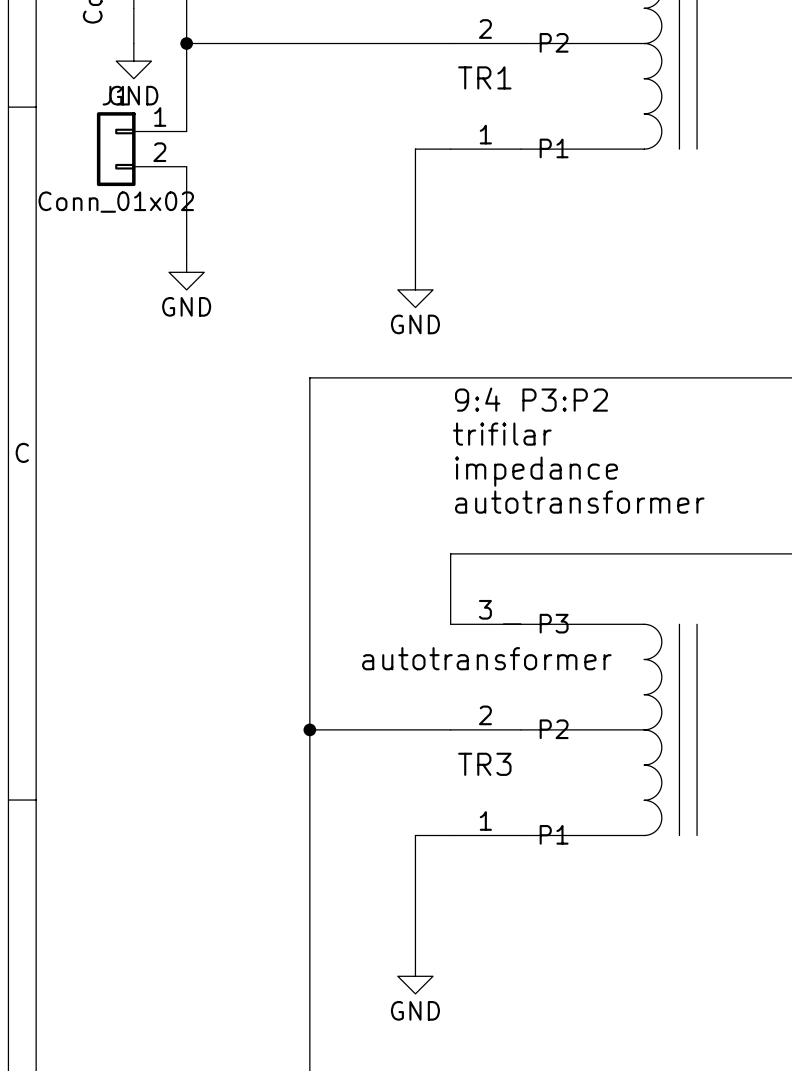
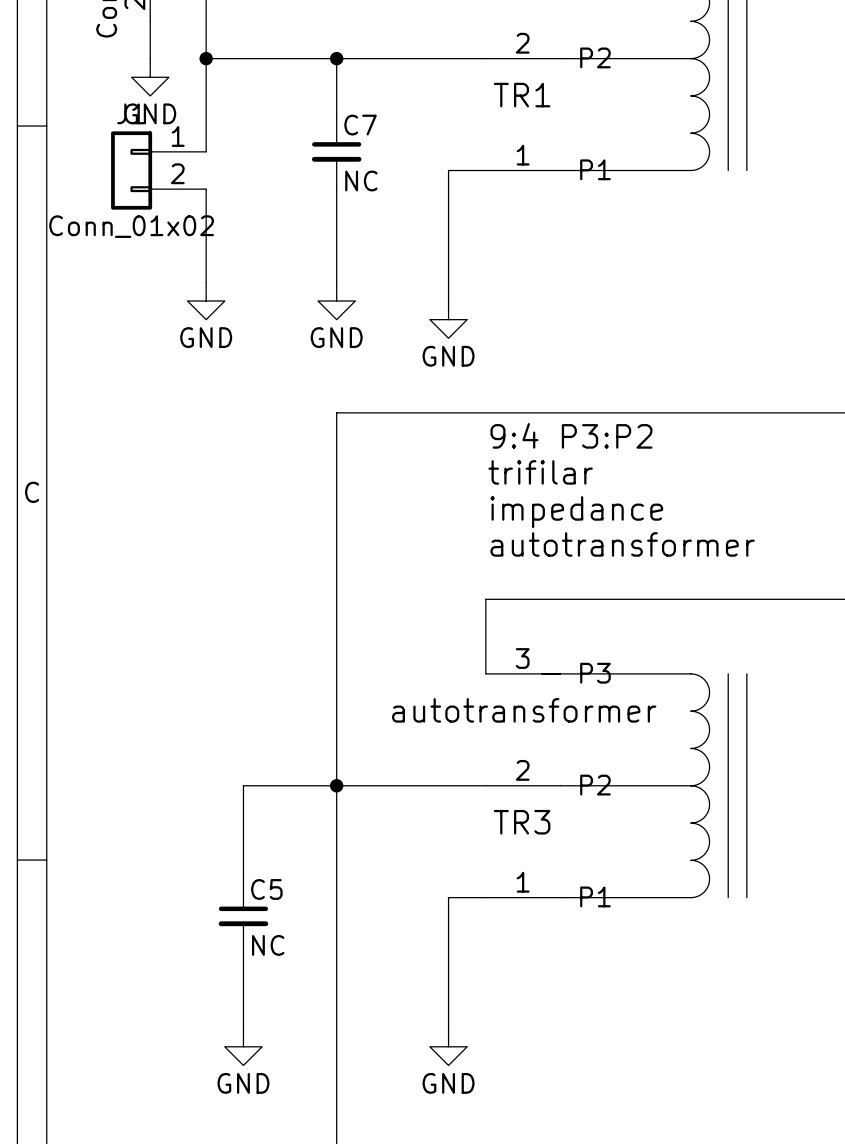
wire: none -> (336, 58) (336, 114)
junction: none -> (336, 58)
C7: none -> NC (336, 151)
wire: none -> (336, 189) (336, 282)
power symbol: none -> GND (336, 301)
wire: none -> (336, 785) (243, 785) (243, 878)
C5: none -> NC (243, 916)
wire: none -> (243, 953) (243, 1028)
power symbol: none -> GND (243, 1046)

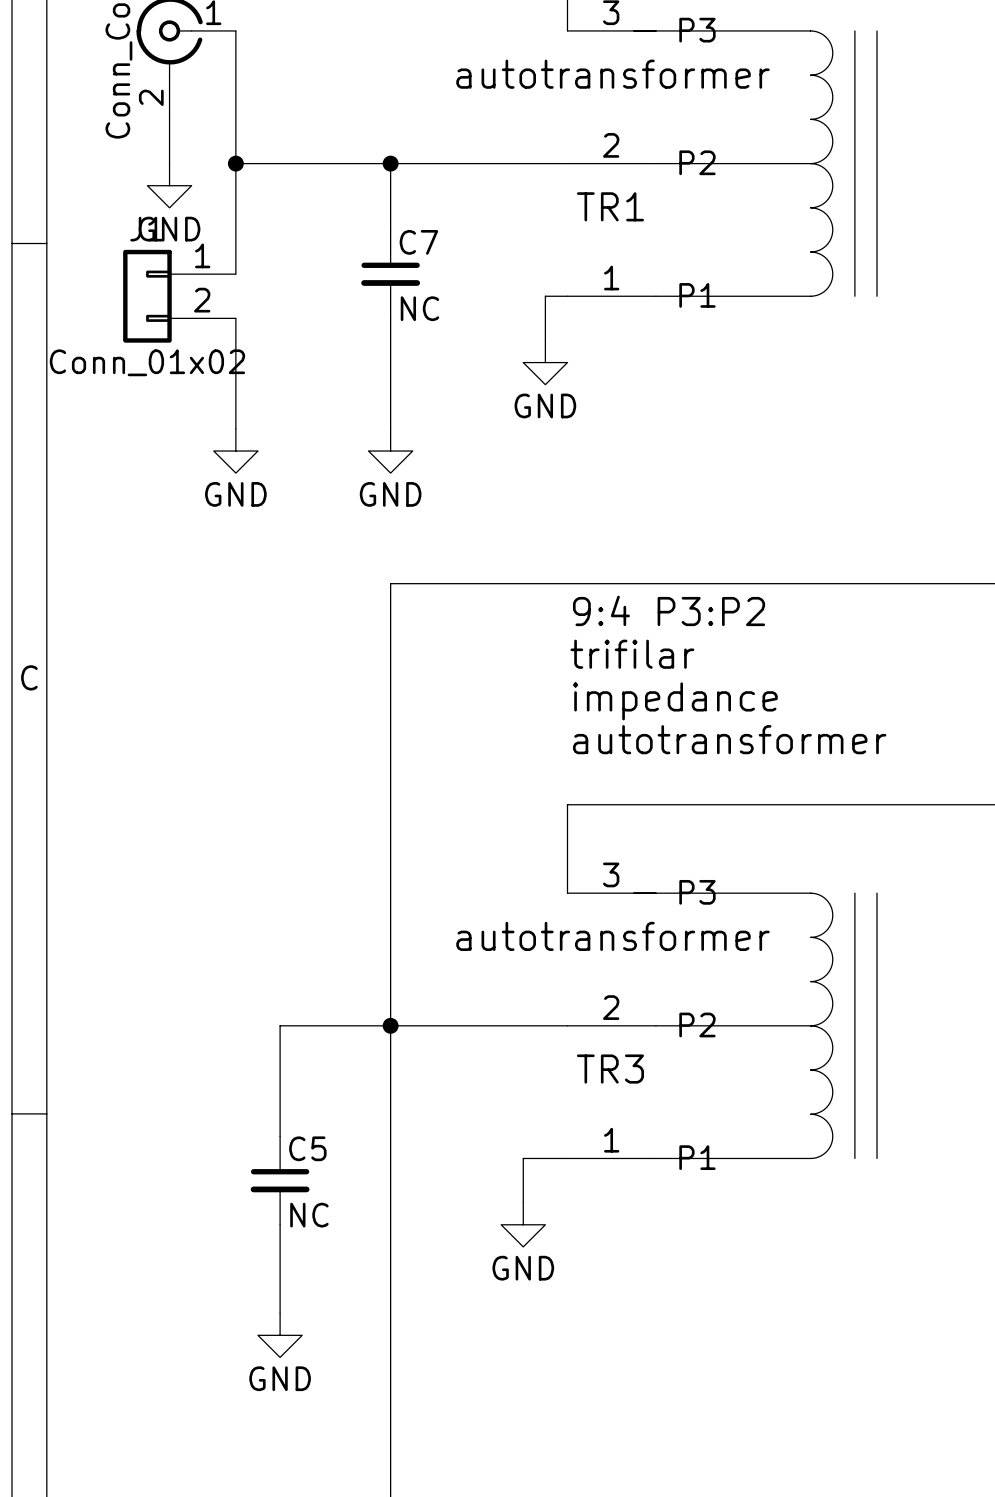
wire: (467, 170) (448, 170) (448, 301) -> (545, 296) (545, 340)
power symbol position: GND (448, 319) -> GND (545, 362)
wire: (448, 934) (448, 1028) -> none
power symbol position: GND (448, 1046) -> GND (523, 1224)

